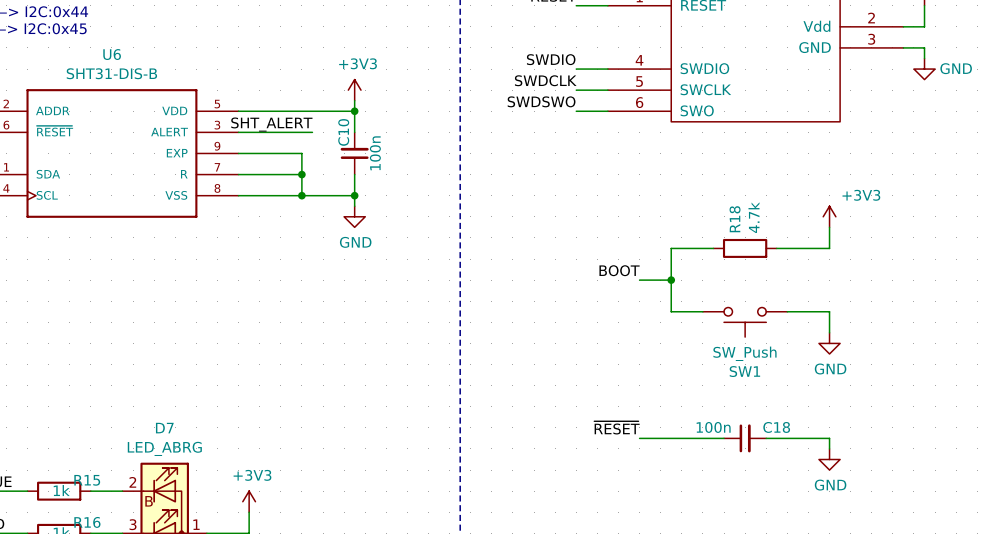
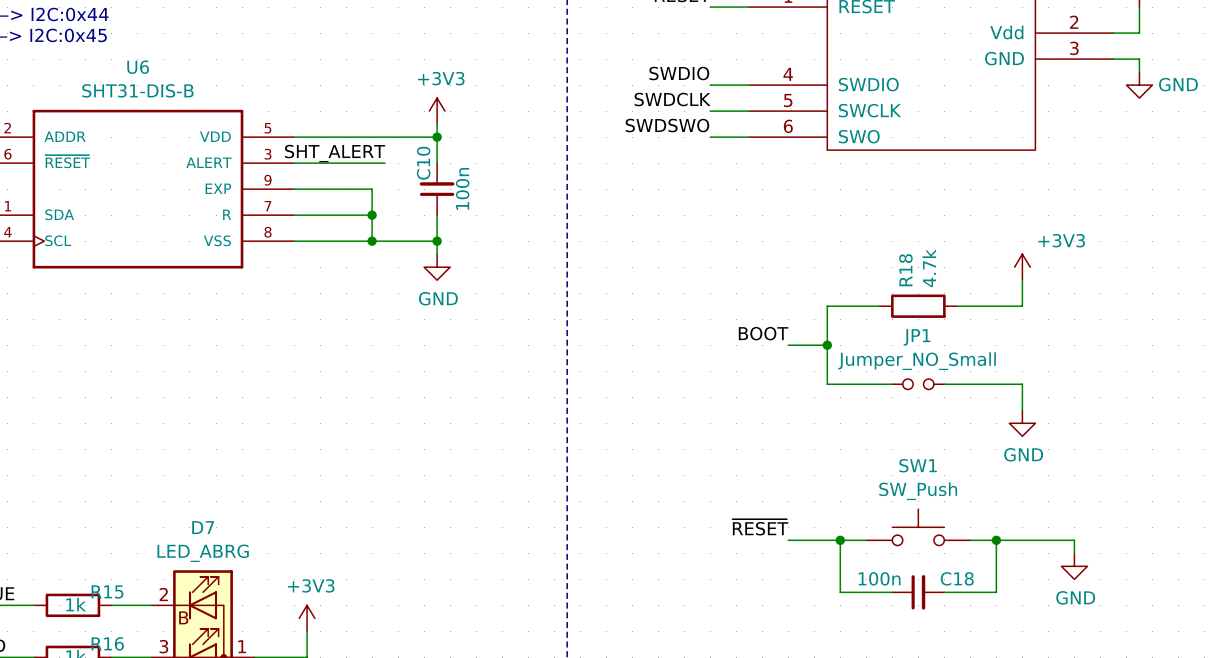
JP1: none -> Jumper_NO_Small (918, 384)
SW1 rotation: 0° (745, 322) -> 180° (918, 527)
SW1 position: (745, 322) -> (918, 527)
wire: none -> (840, 540) (840, 592) (892, 592)
junction: none -> (840, 540)
C18 position: (745, 438) -> (918, 592)
wire: none -> (996, 540) (996, 592) (944, 592)
junction: none -> (996, 540)
wire: (829, 438) (829, 448) -> (1022, 540) (1074, 540) (1074, 553)
power symbol position: GND (829, 459) -> GND (1074, 566)

